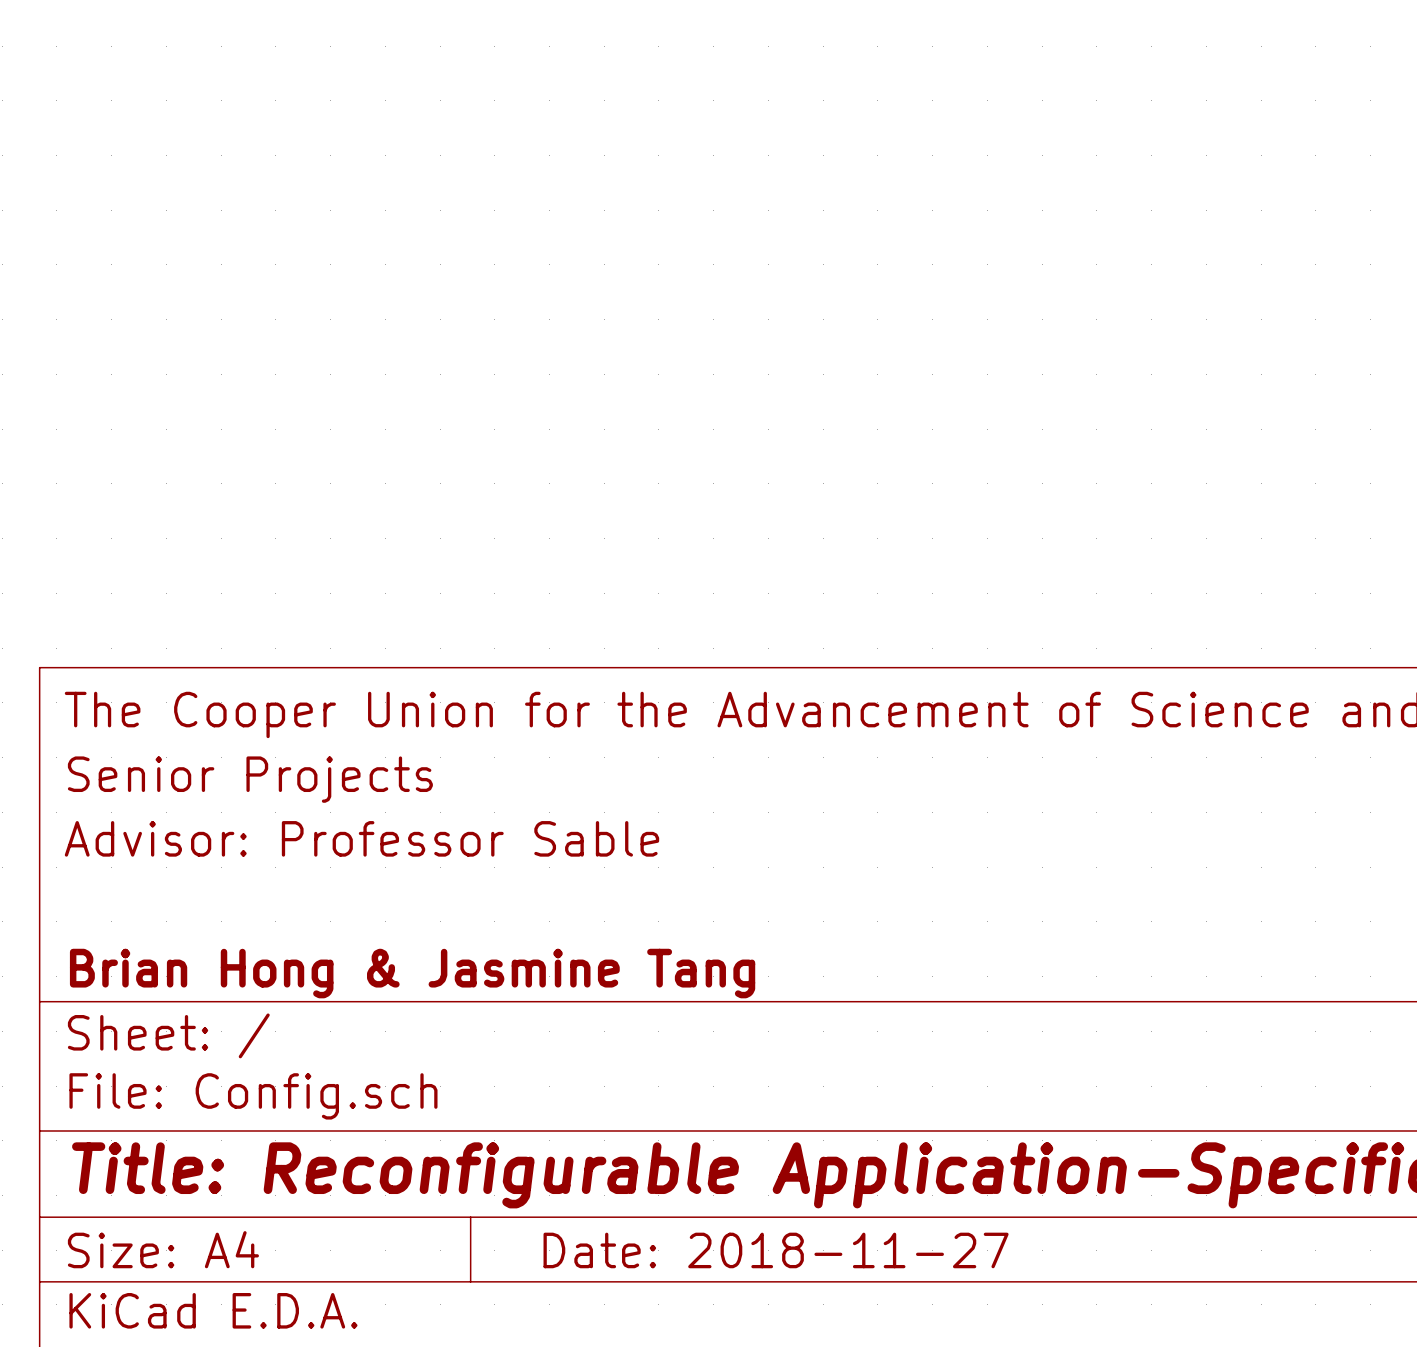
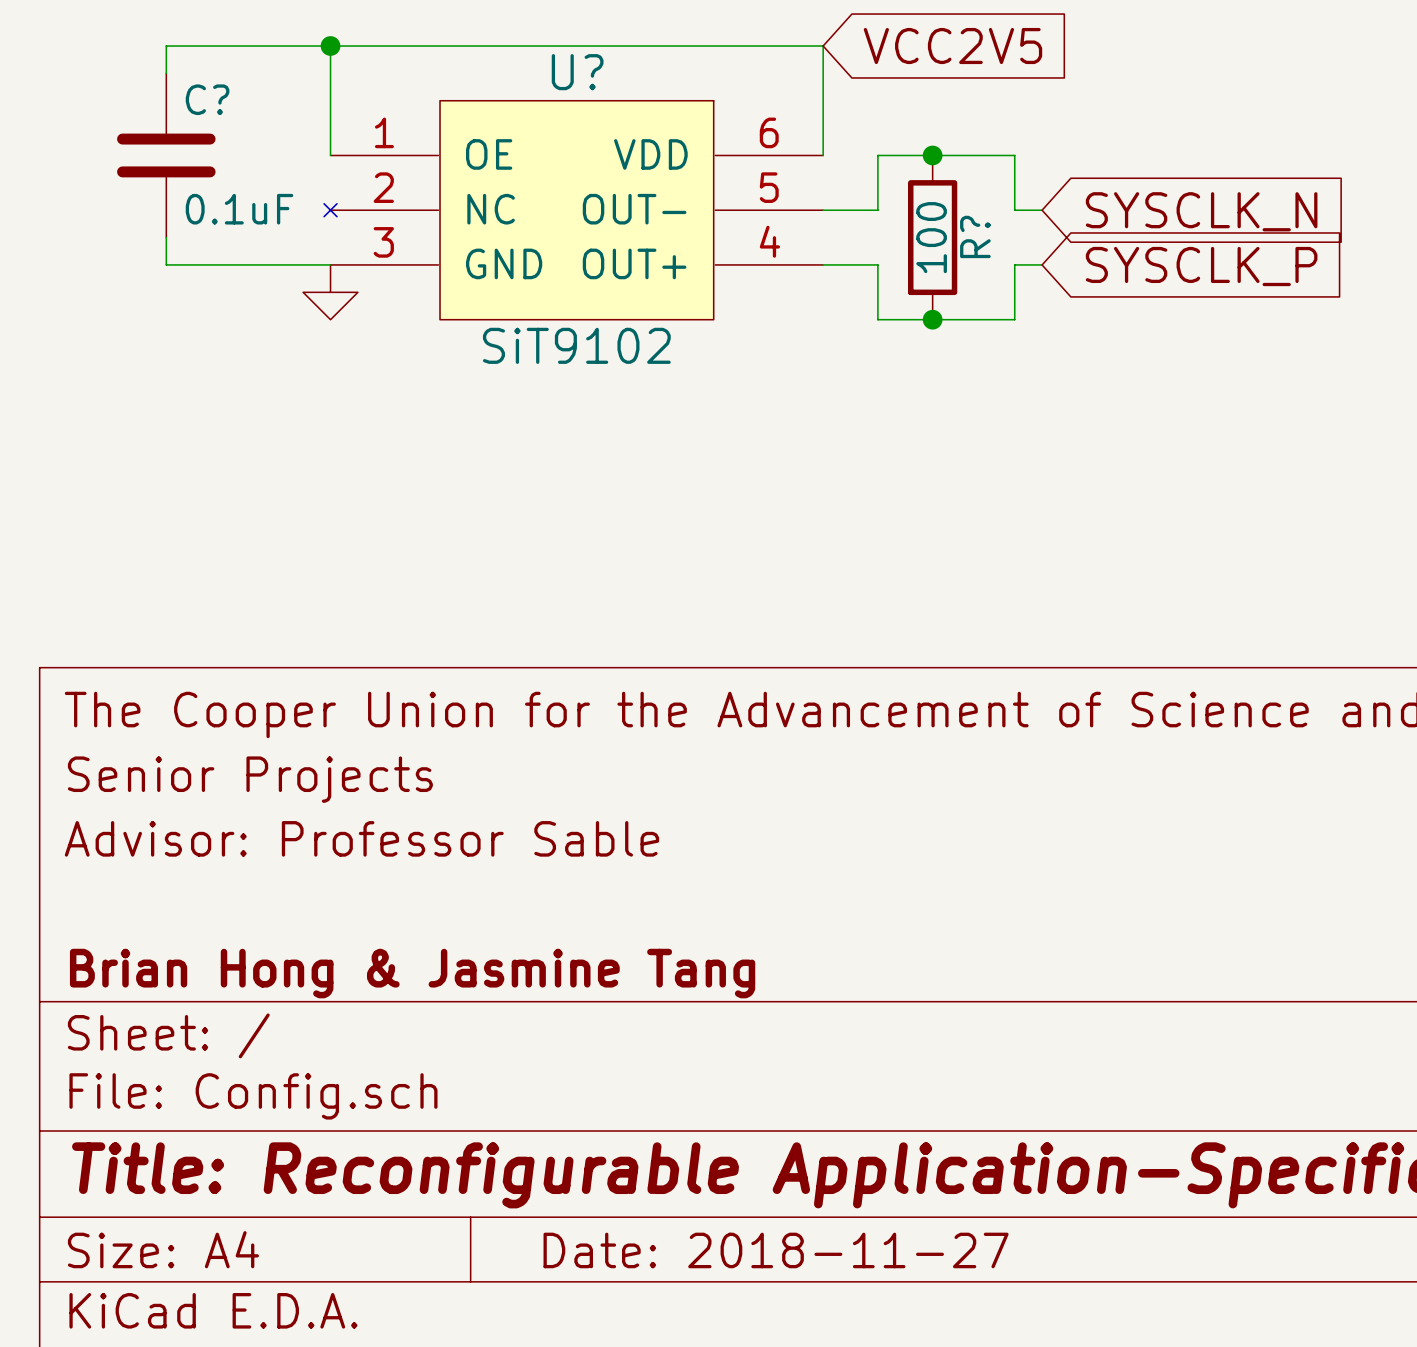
wire: none -> (330, 46) (330, 155)
junction: none -> (330, 46)
global label: none -> VCC2V5 (952, 46)
wire: none -> (166, 73) (166, 46) (823, 46) (823, 155)
C?: none -> 0.1uF (166, 155)
junction: none -> (932, 155)
U?: none -> SiT9102 (573, 210)
wire: none -> (823, 210) (877, 210) (877, 155) (1014, 155) (1014, 210) (1042, 210)
global label: none -> SYSCLK_N (1201, 211)
wire: none -> (166, 237) (166, 264) (330, 264)
R?: none -> 100 (932, 237)
wire: none -> (823, 264) (877, 264) (877, 319) (1014, 319) (1014, 264) (1042, 264)
global label: none -> SYSCLK_P (1201, 266)
power symbol: none -> (330, 292)
junction: none -> (932, 319)

